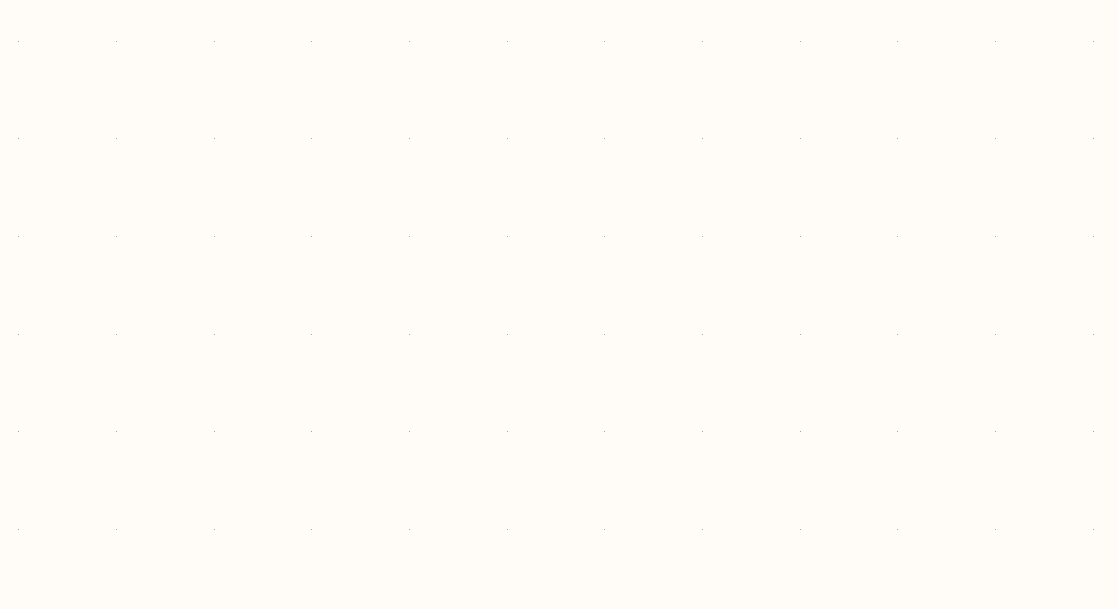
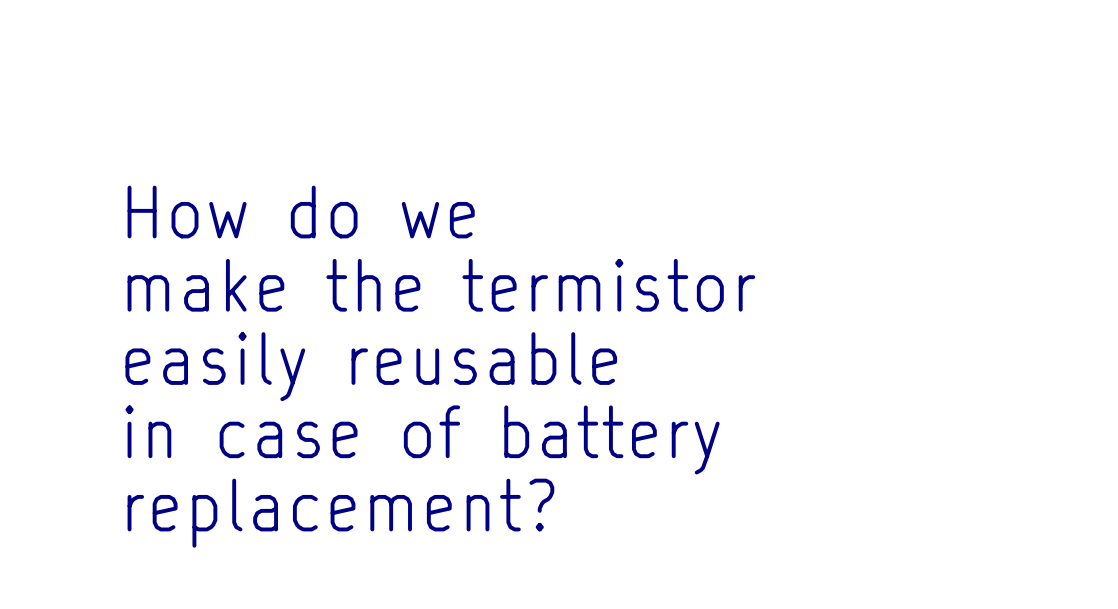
text: none -> How do we (301, 212)
text: none -> make the termistor (441, 285)
text: none -> easily reusable (371, 366)
text: none -> in case of battery (422, 439)
text: none -> replacement? (340, 513)

